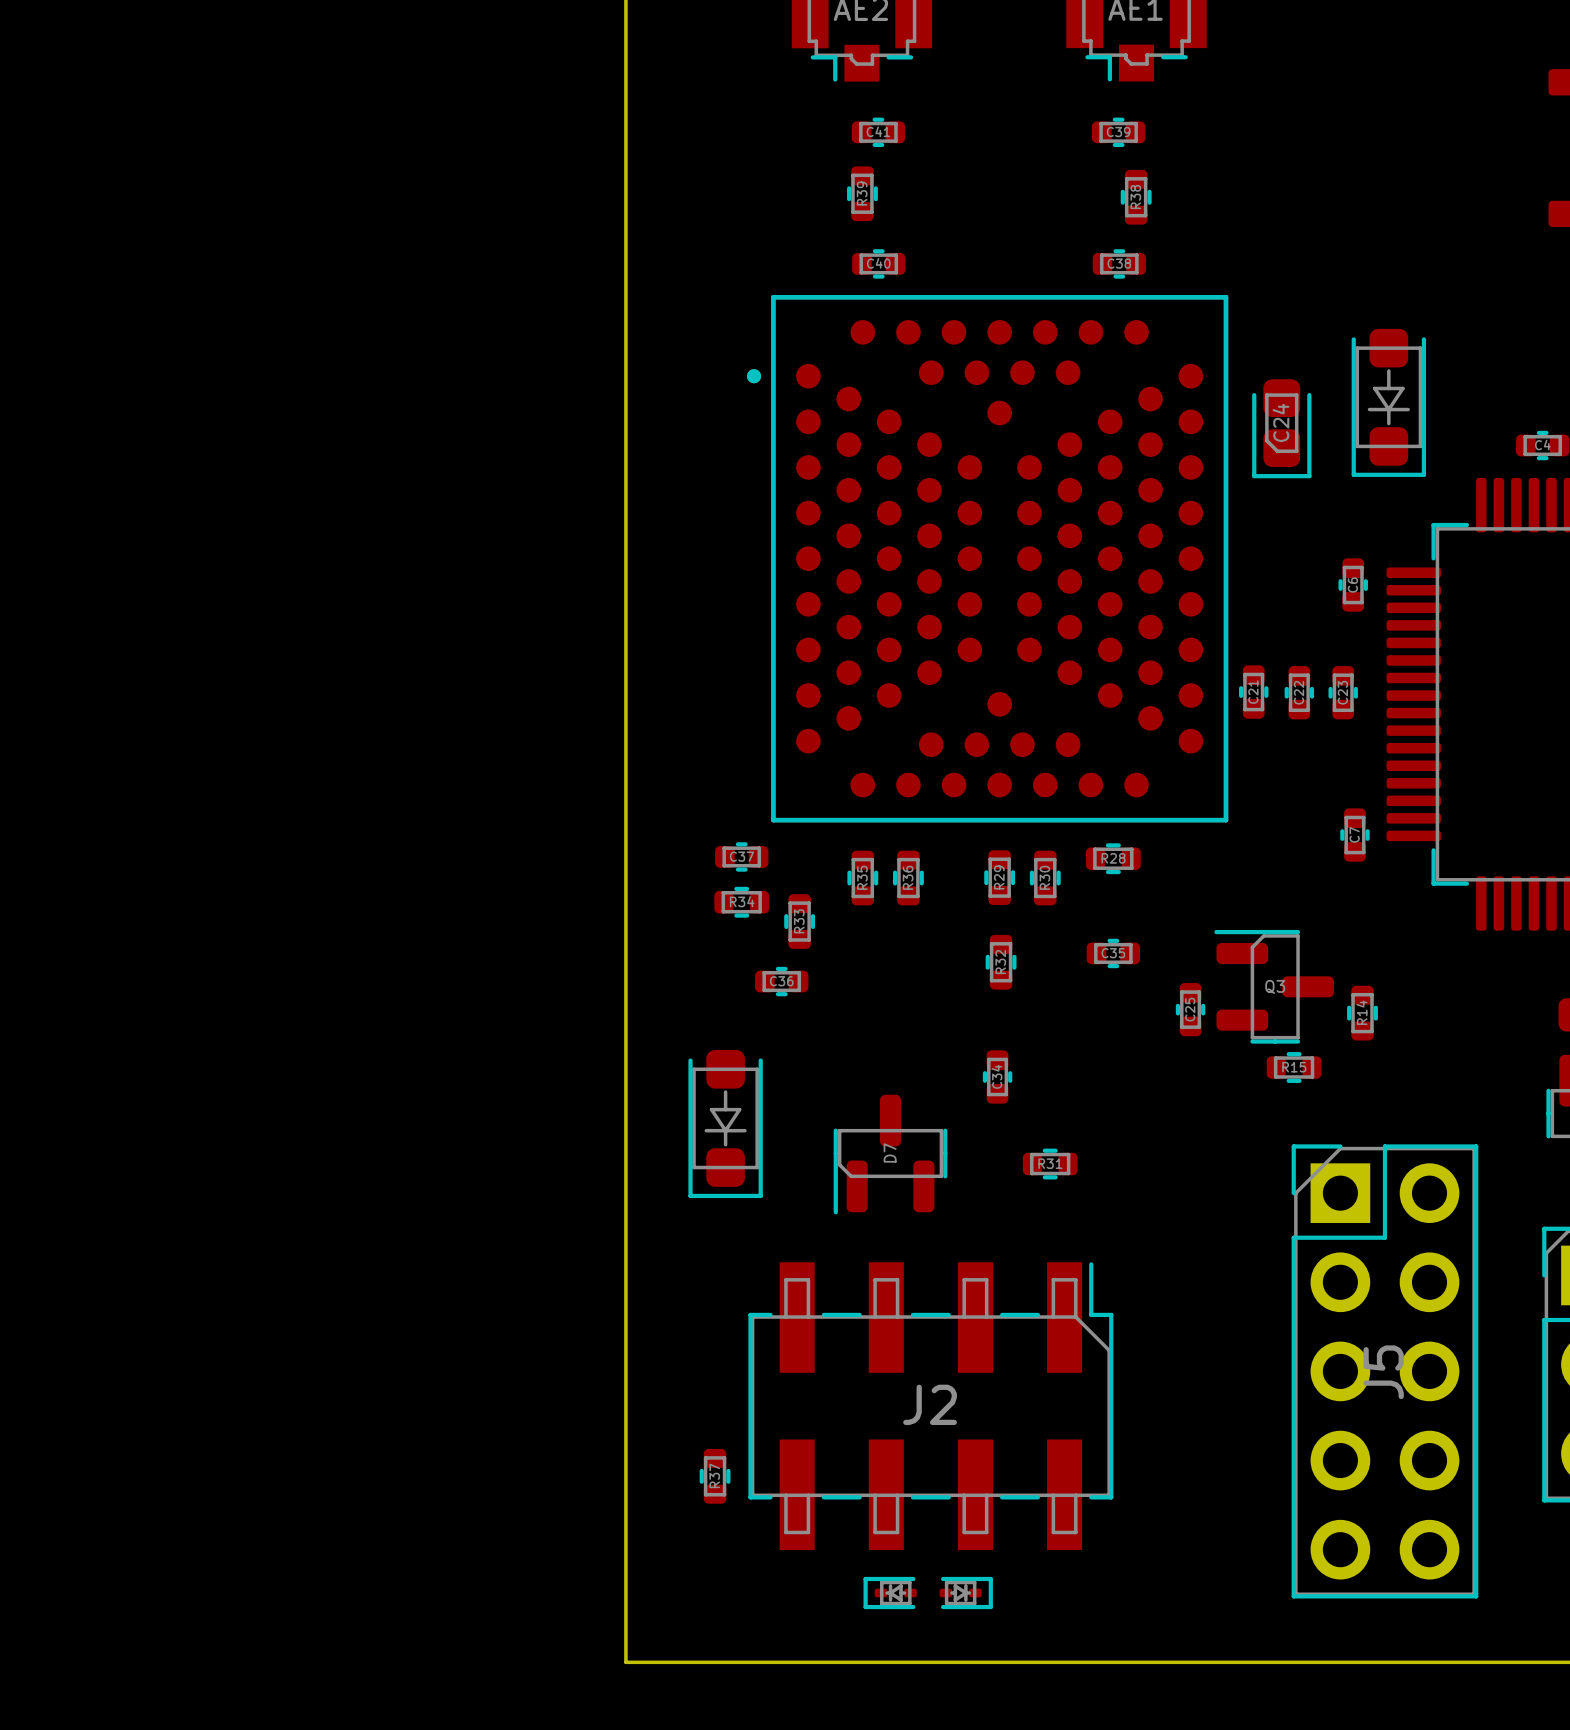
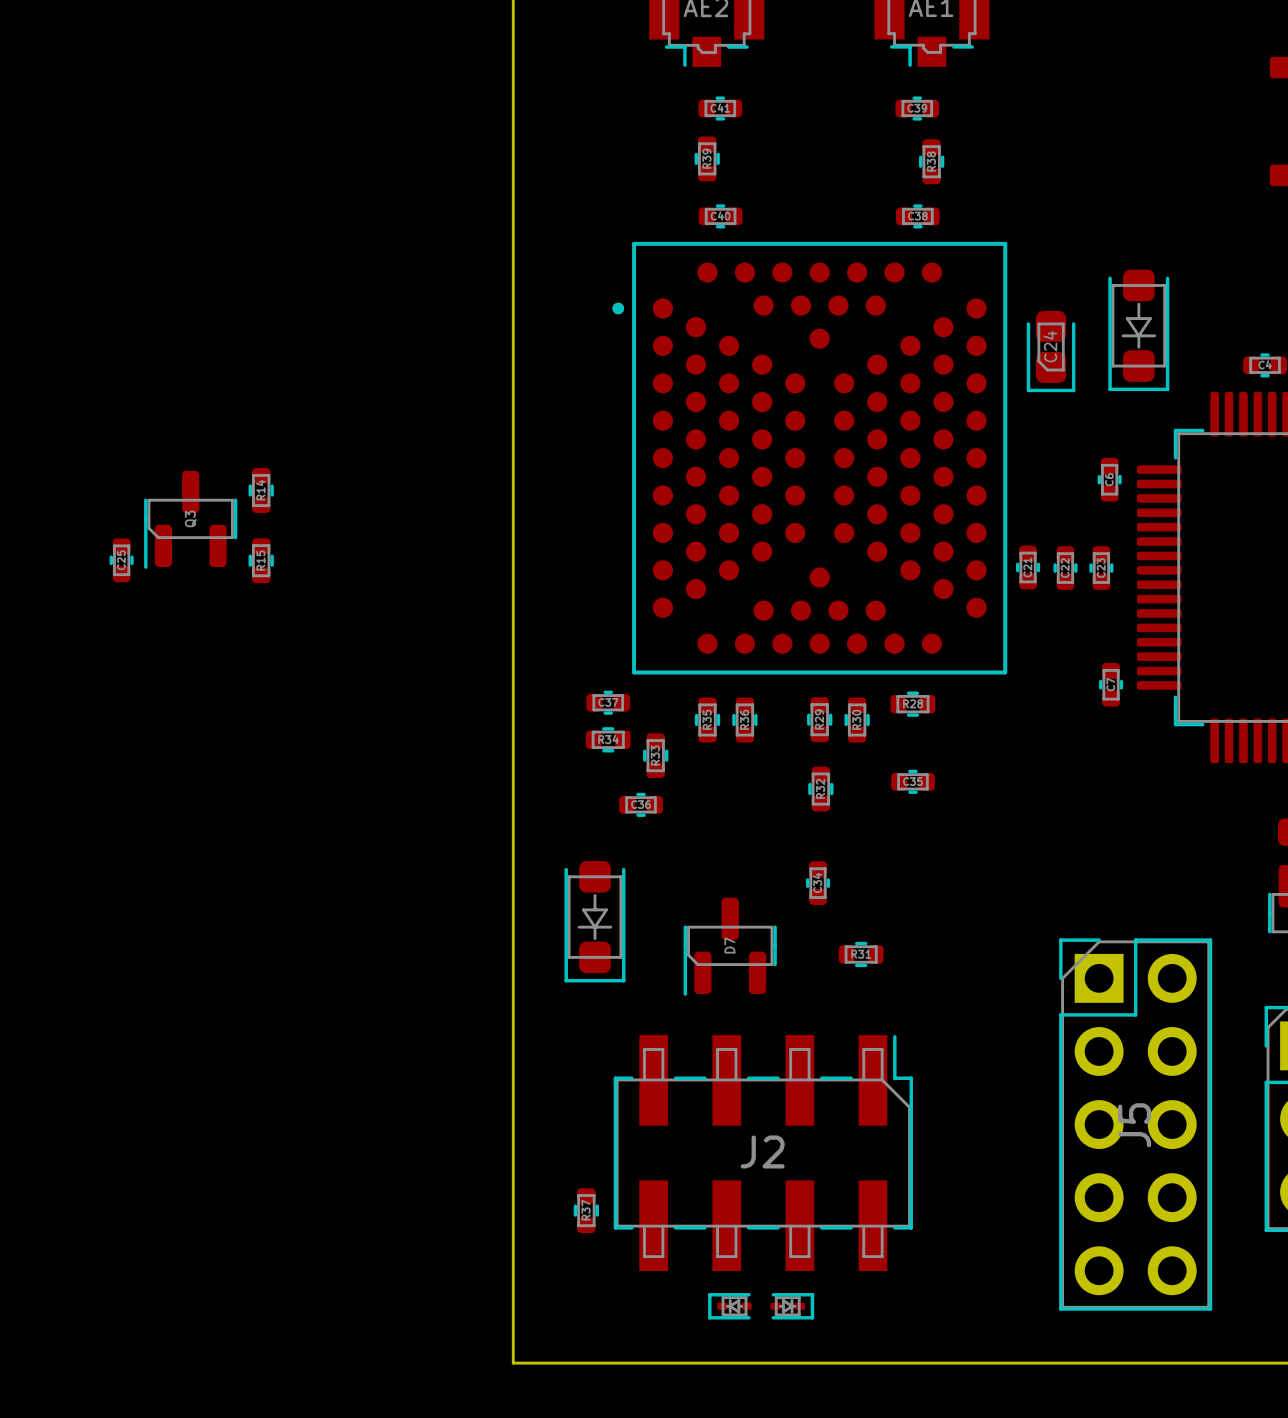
Q3 rotation: 0° (1274, 986) -> 90° counterclockwise (190, 519)
Q3 position: (1274, 986) -> (190, 519)
C25 position: (1190, 1009) -> (121, 560)
R14 position: (1362, 1013) -> (261, 490)
R15 rotation: 0° (1294, 1067) -> 90° clockwise (261, 560)
R15 position: (1294, 1067) -> (261, 560)

